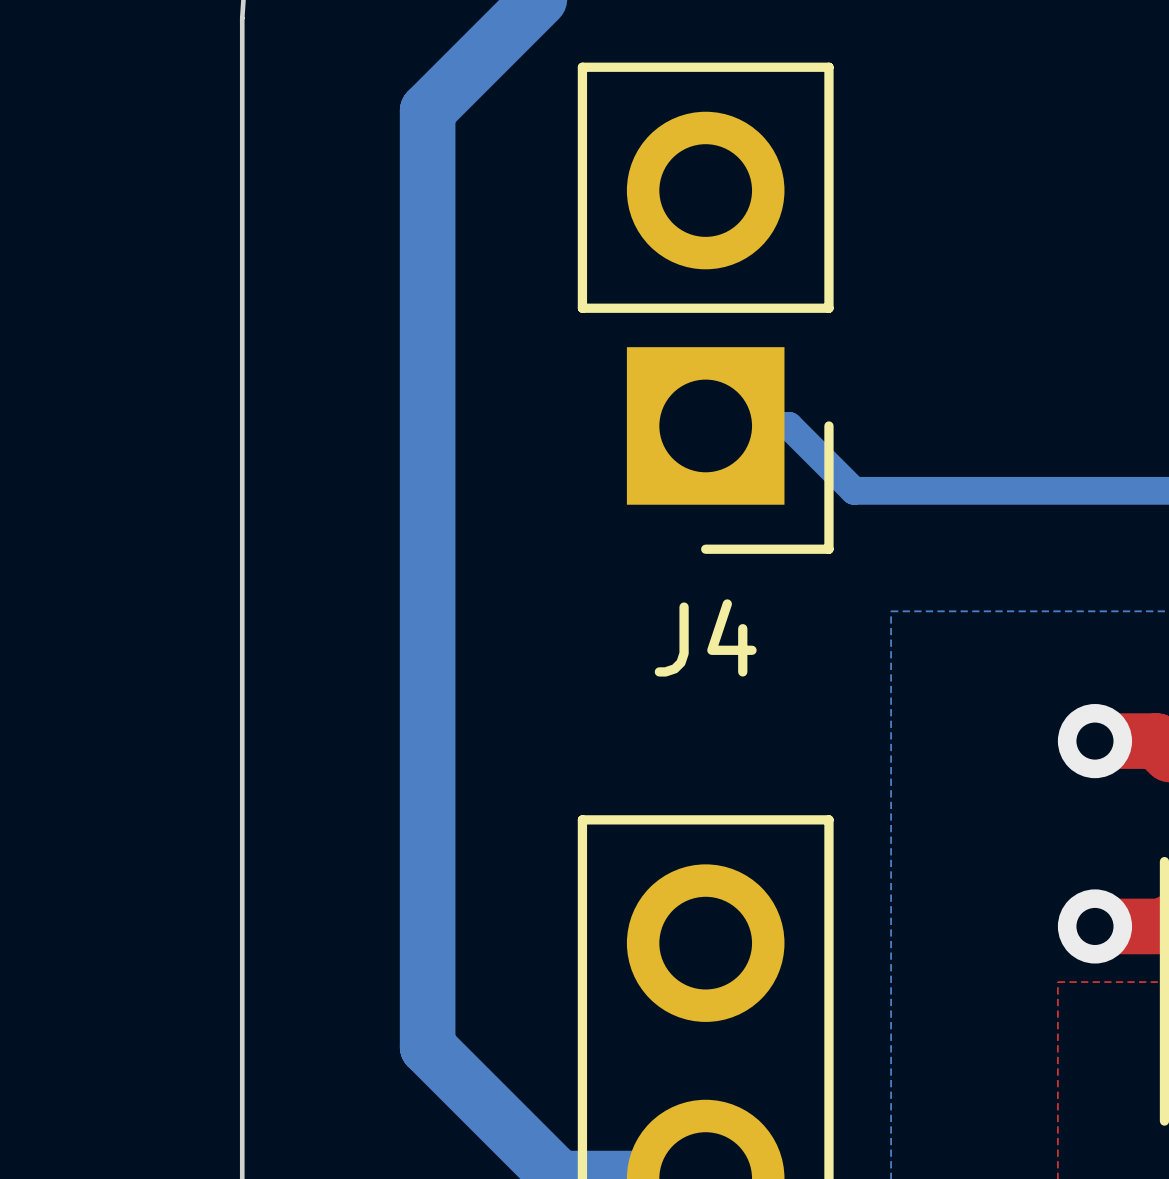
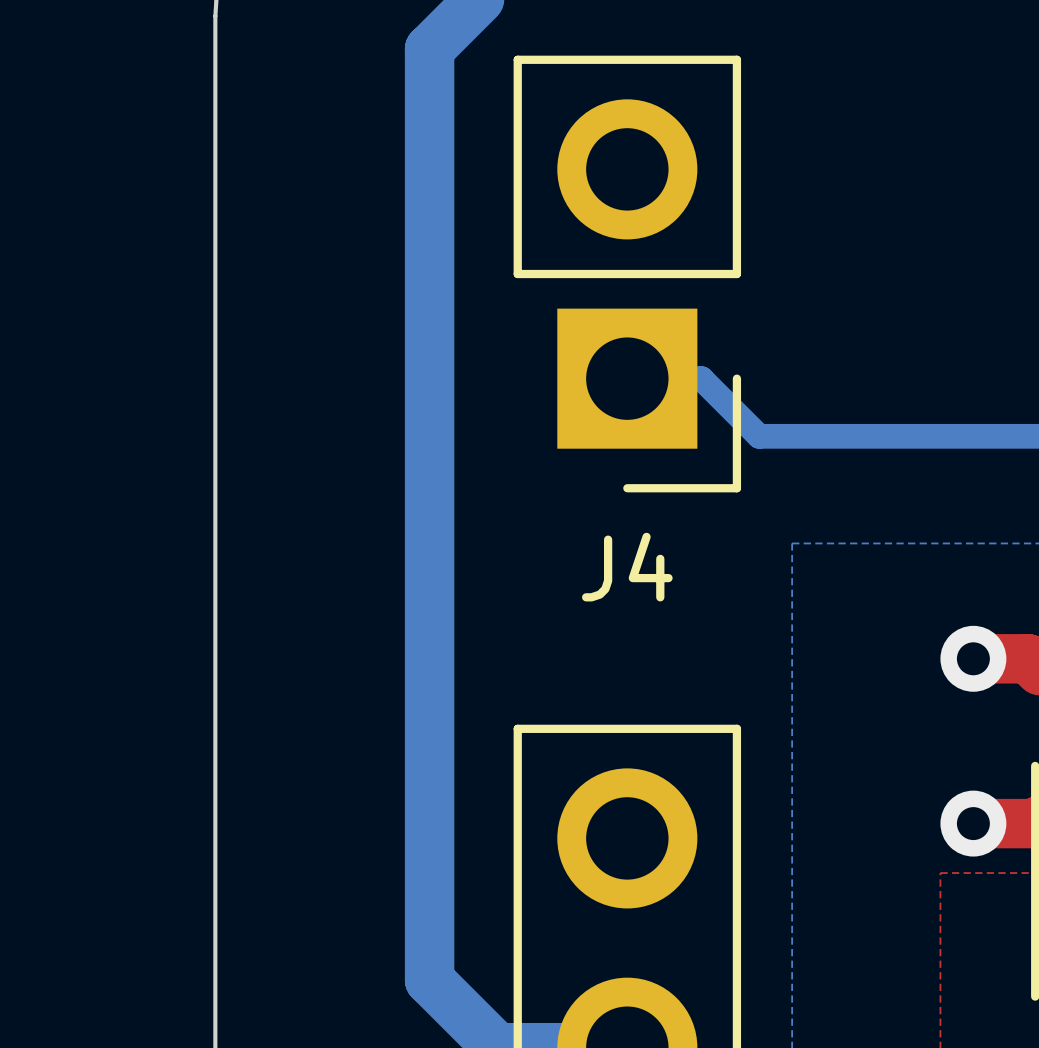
bottom track: (483, 55) (427, 110) (427, 1046) (483, 1102) -> (429, 49) (429, 980)

